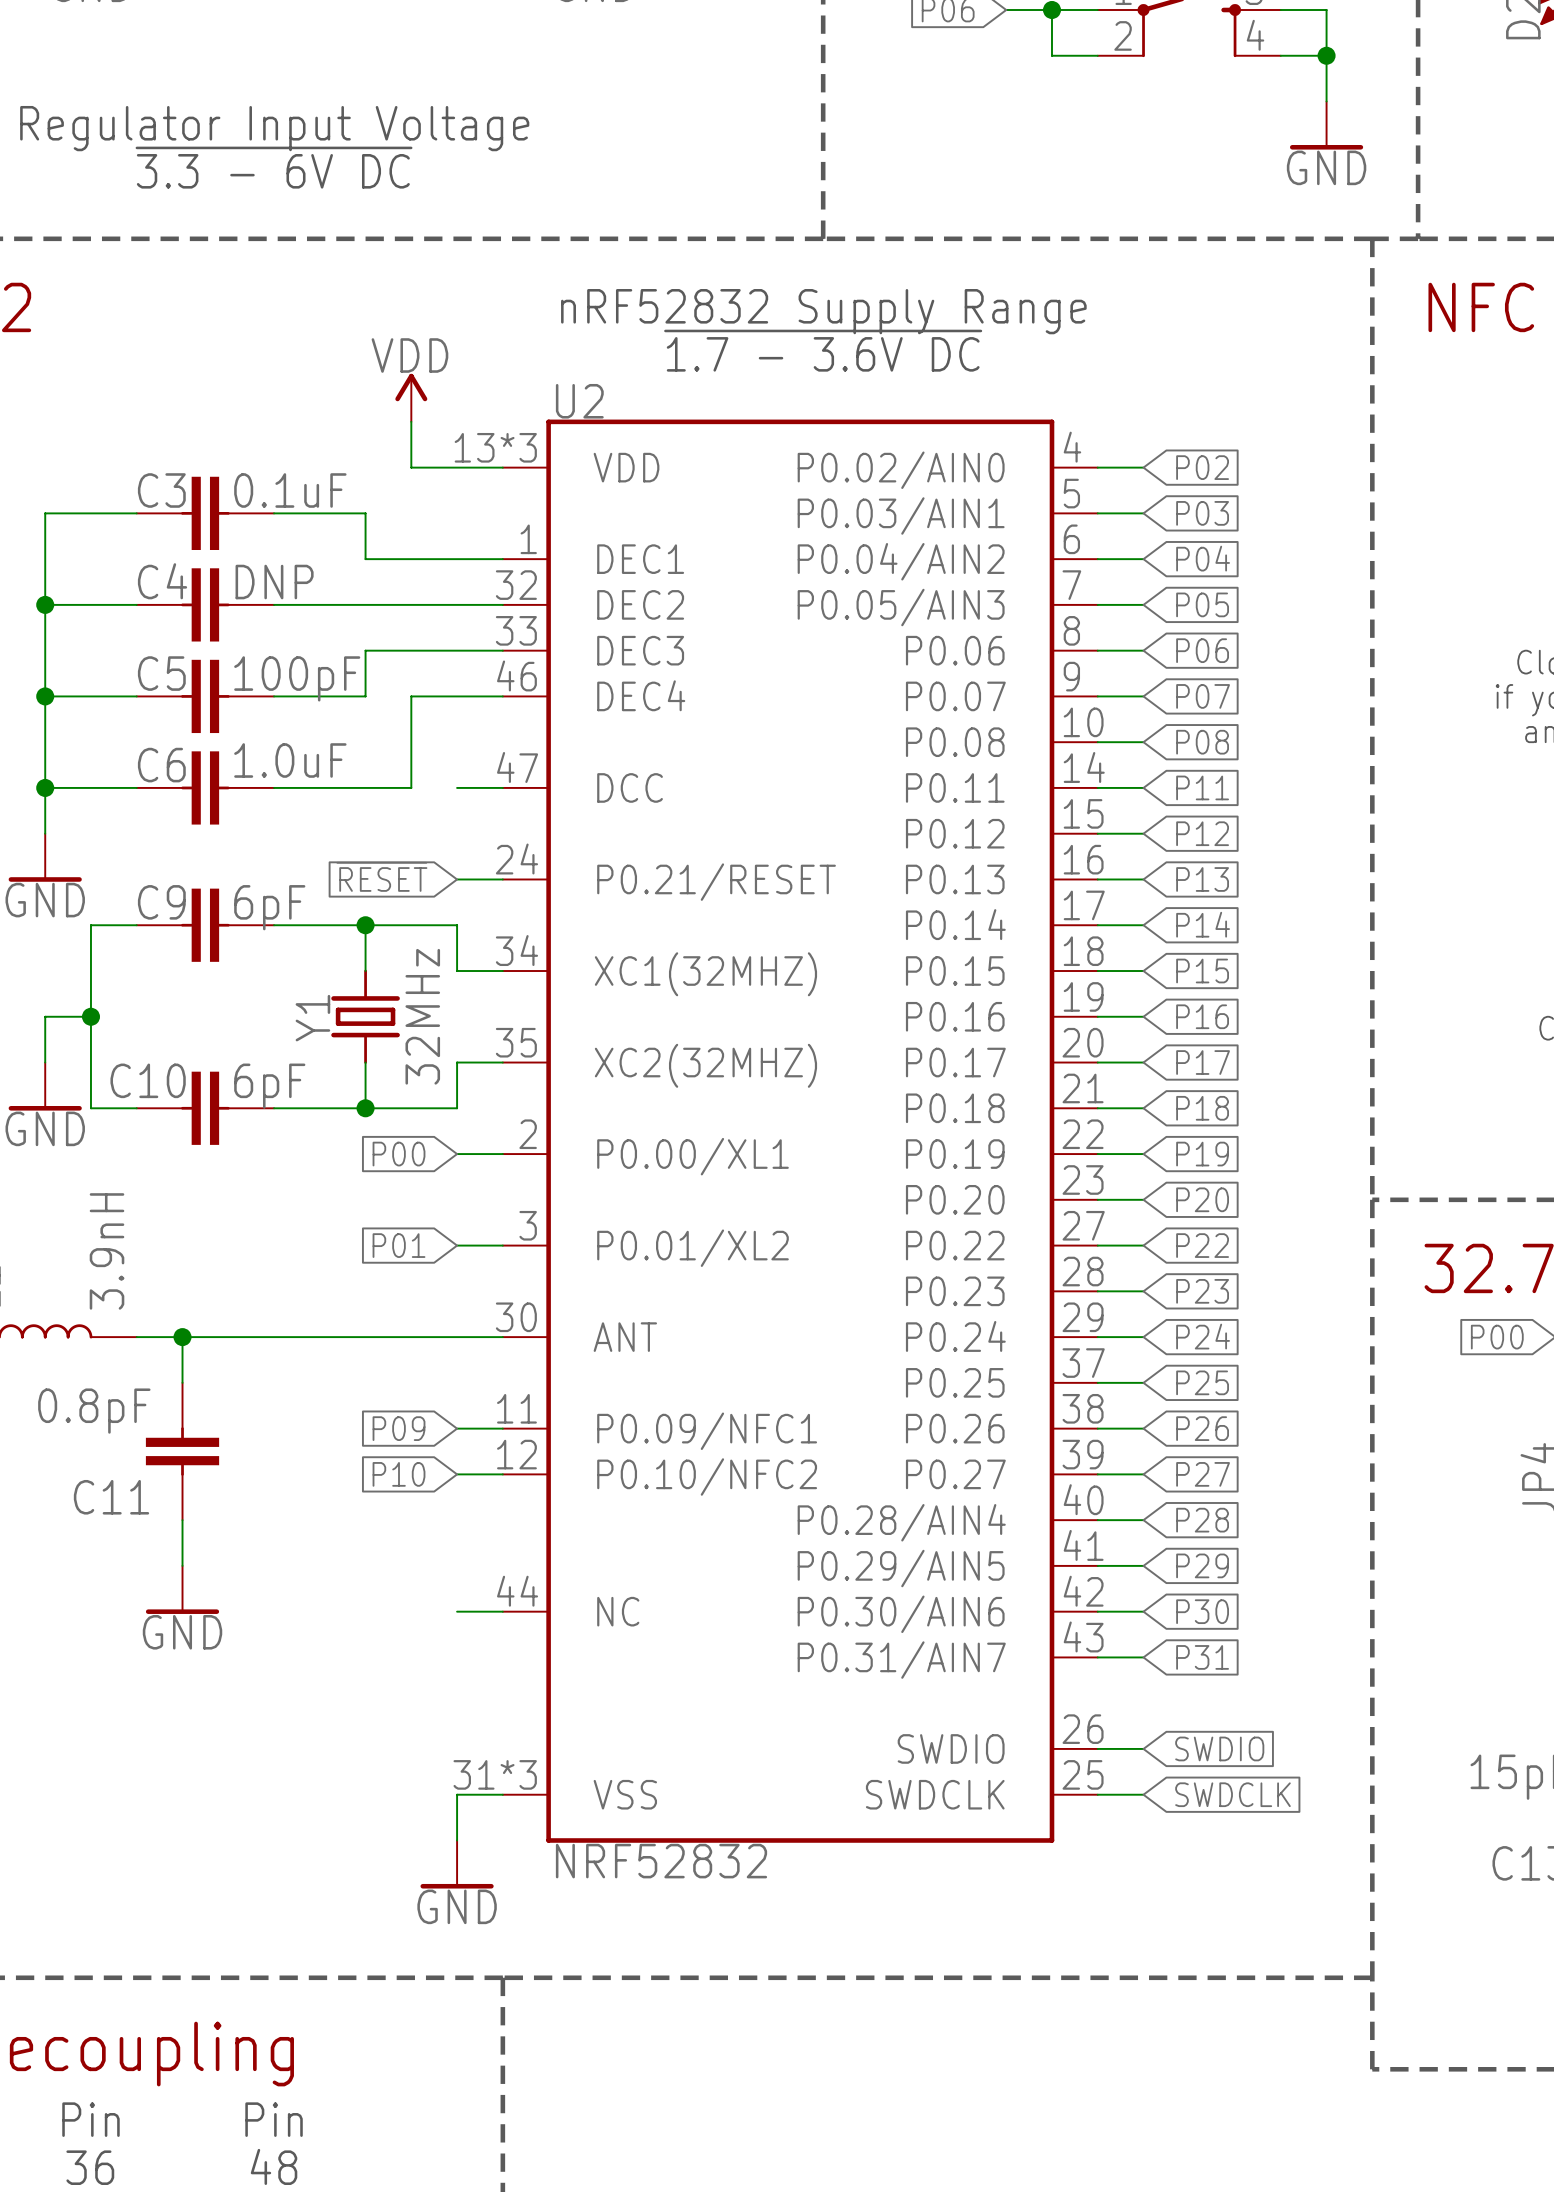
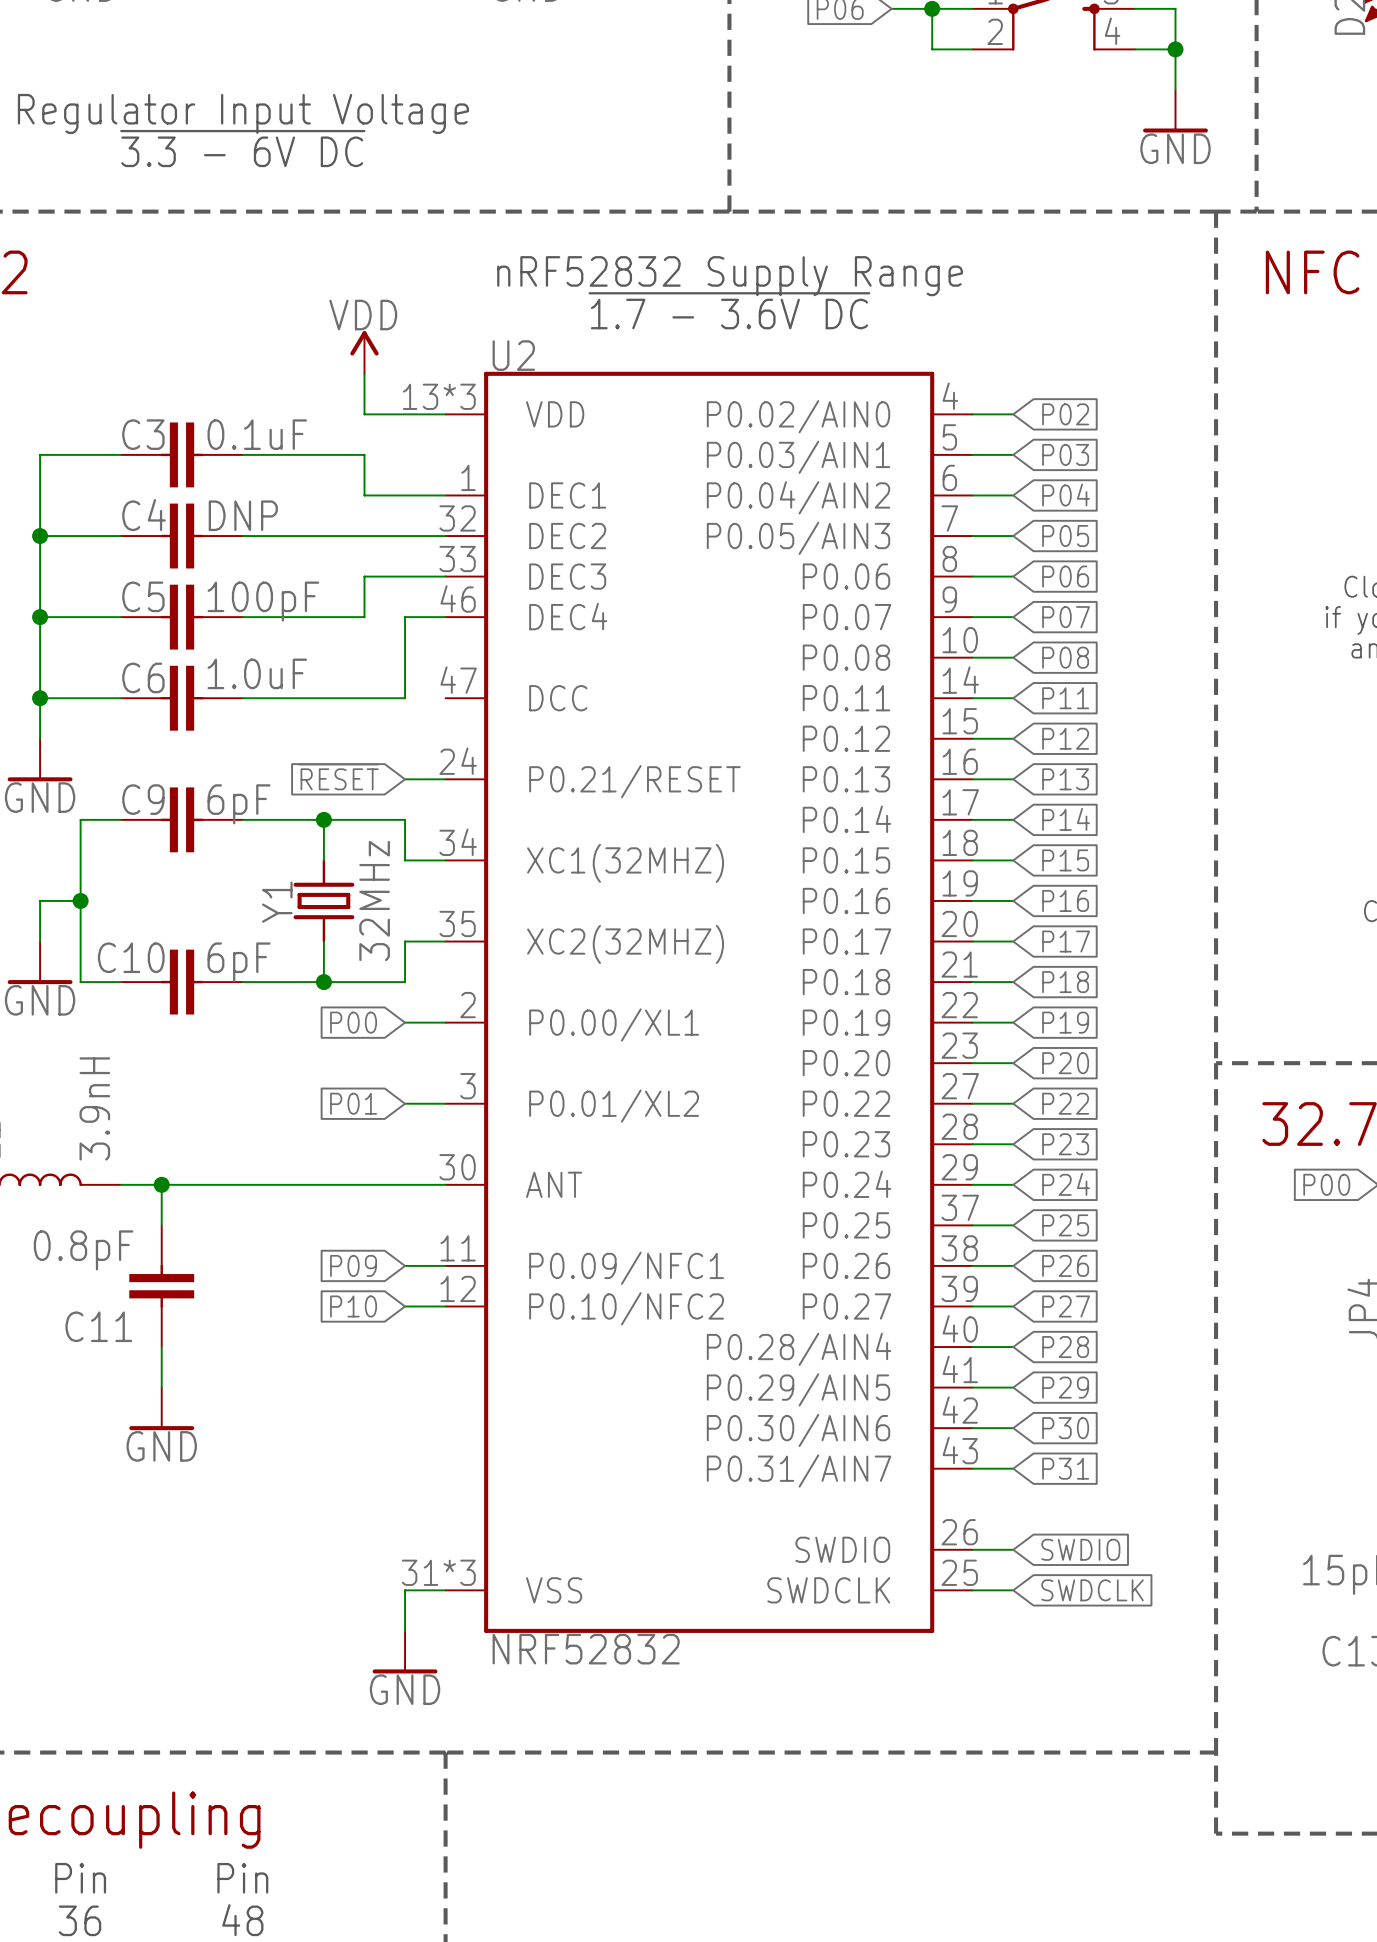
U2 symbol: [502, 419, 1098, 1843] -> [445, 371, 973, 1633]
wire: (365, 513) (365, 559) (411, 559) -> (323, 454) (364, 454) (364, 495)
wire: (411, 650) (365, 650) (365, 696) -> (364, 576) (364, 617) (323, 617)
wire: (457, 696) (411, 696) (411, 787) -> (405, 617) (405, 698) (364, 698)
wire: (457, 787) (502, 787) -> none
wire: (457, 1611) (502, 1611) -> none

